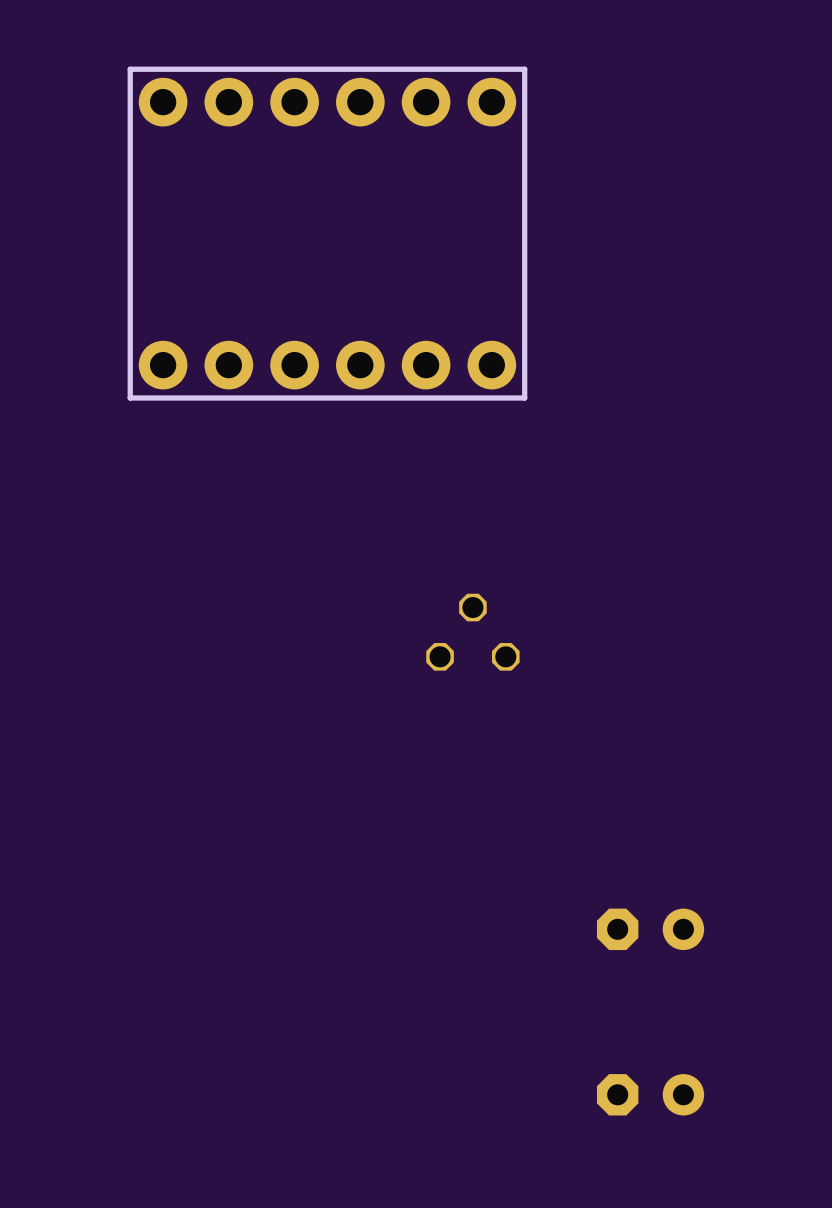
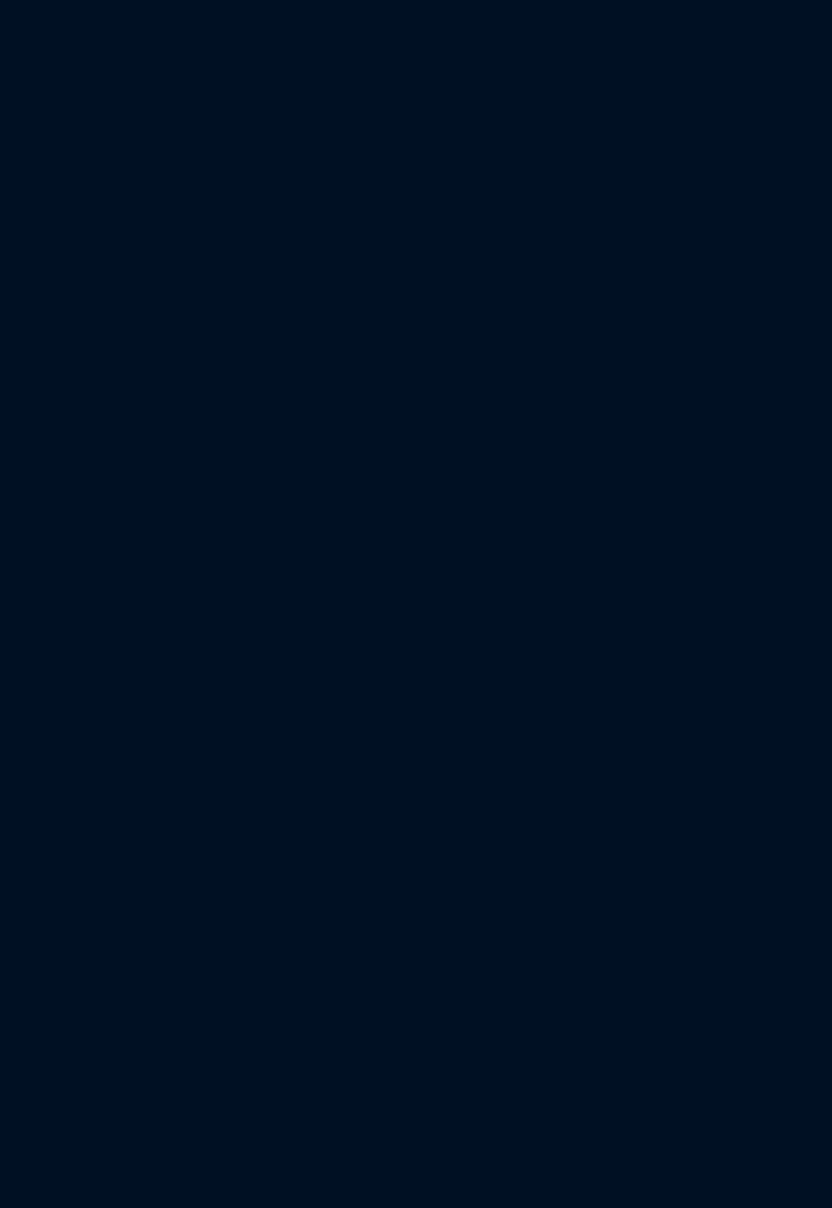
part: (327, 233) -> none
part: (472, 632) -> none
part: (650, 929) -> none
part: (650, 1094) -> none

